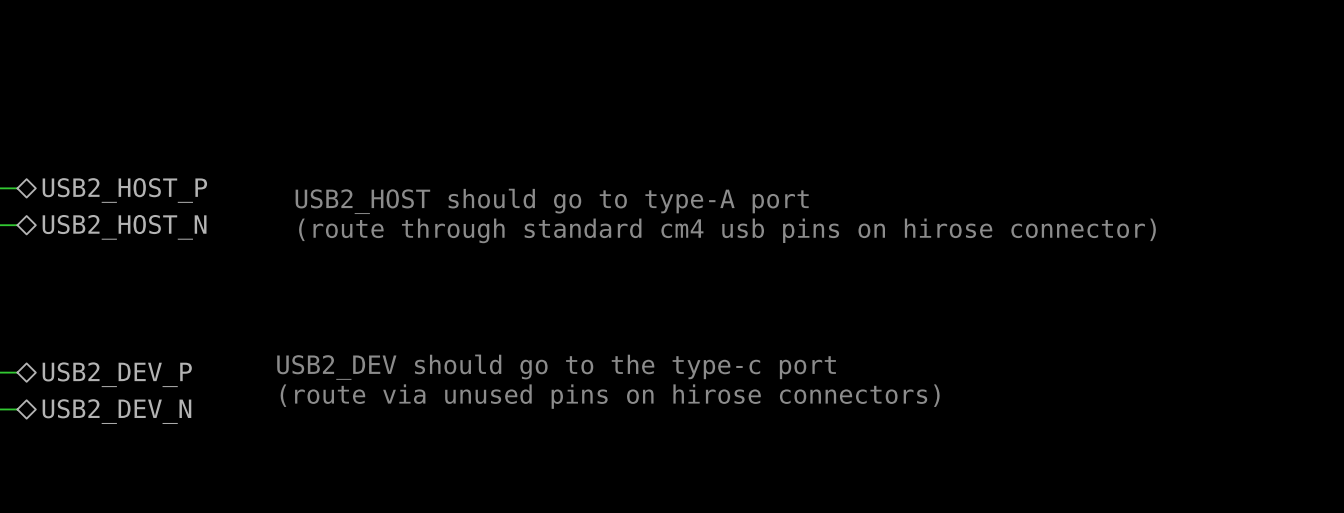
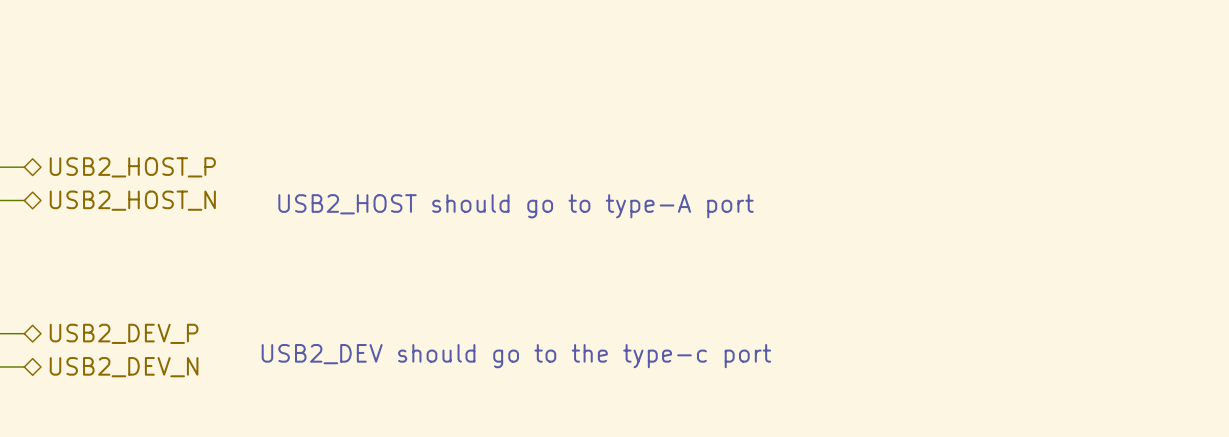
text: USB2_HOST should go to type-A port (552, 201) -> none
text: (route through standard cm4 usb pins on hirose connector) (727, 230) -> USB2_HOST should go to type-A port (516, 206)
text: USB2_DEV should go to the type-c port (556, 367) -> none
text: (route via unused pins on hirose connectors) (610, 396) -> USB2_DEV should go to the type-c port (516, 356)

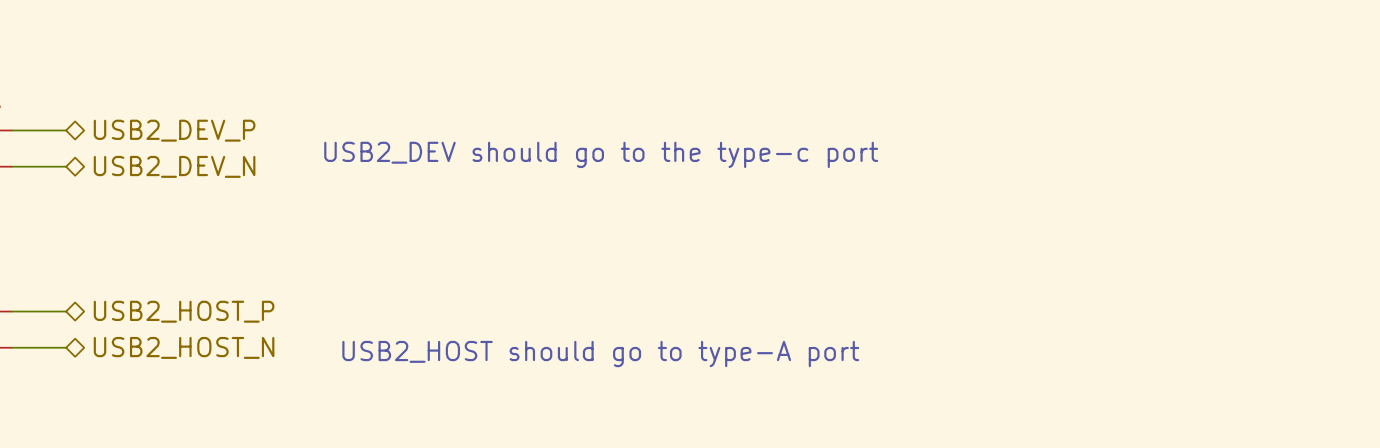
hierarchical label: USB2_HOST_P (132, 167) -> USB2_DEV_P (174, 130)
hierarchical label: USB2_HOST_N (132, 200) -> USB2_DEV_N (174, 166)
text position: USB2_HOST should go to type-A port (516, 206) -> USB2_HOST should go to type-A port (600, 354)
hierarchical label: USB2_DEV_P (124, 333) -> USB2_HOST_P (184, 311)
text position: USB2_DEV should go to the type-c port (516, 356) -> USB2_DEV should go to the type-c port (601, 154)
hierarchical label: USB2_DEV_N (124, 367) -> USB2_HOST_N (184, 347)

